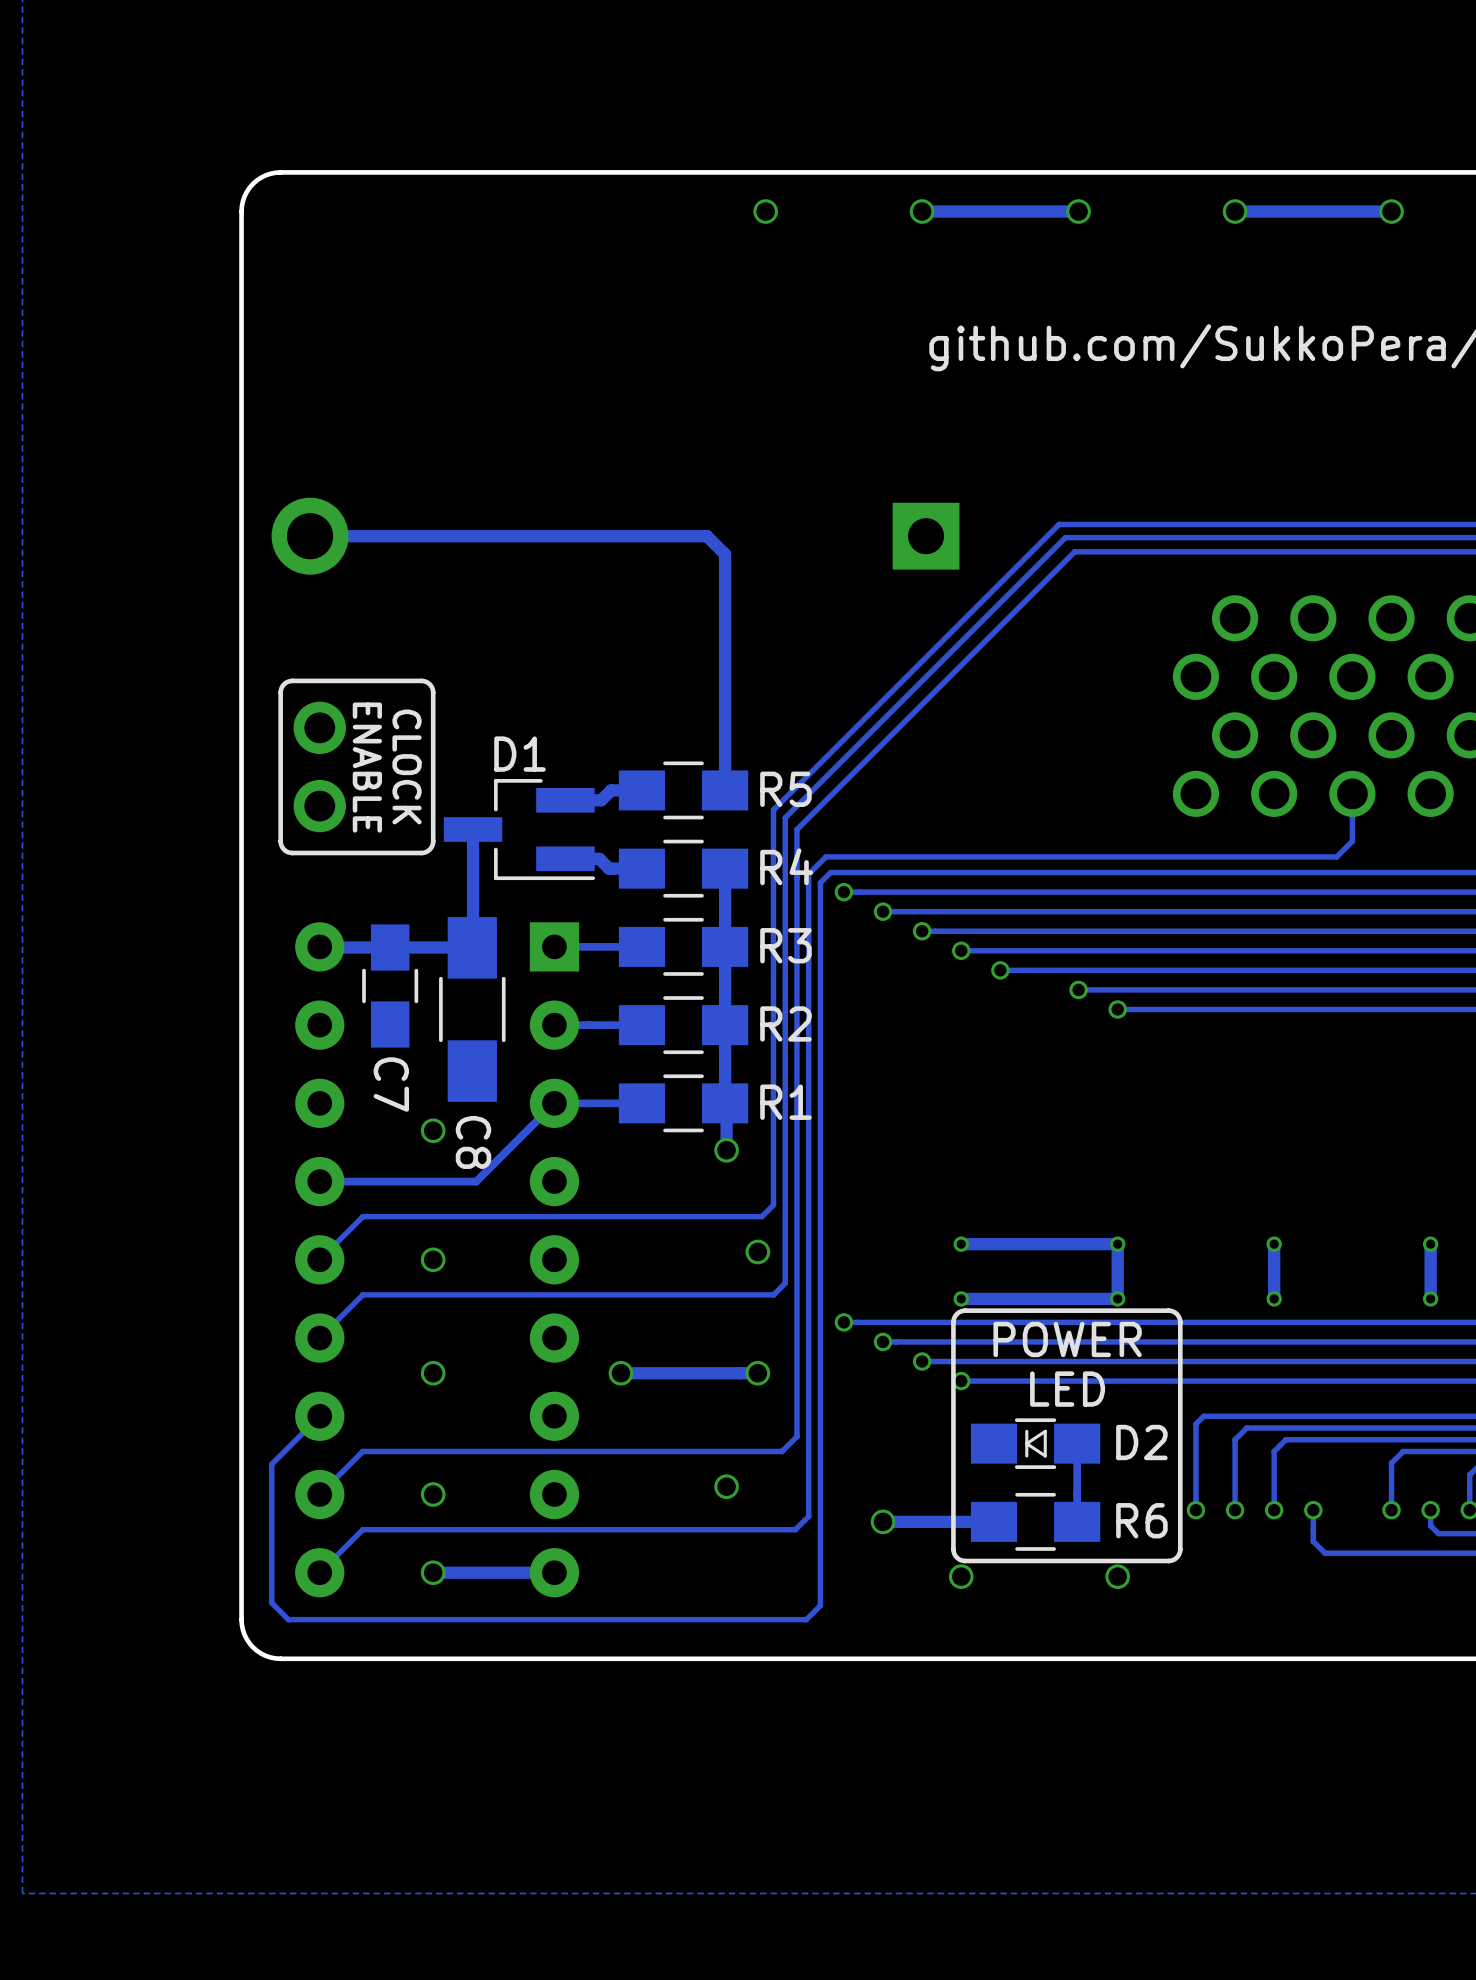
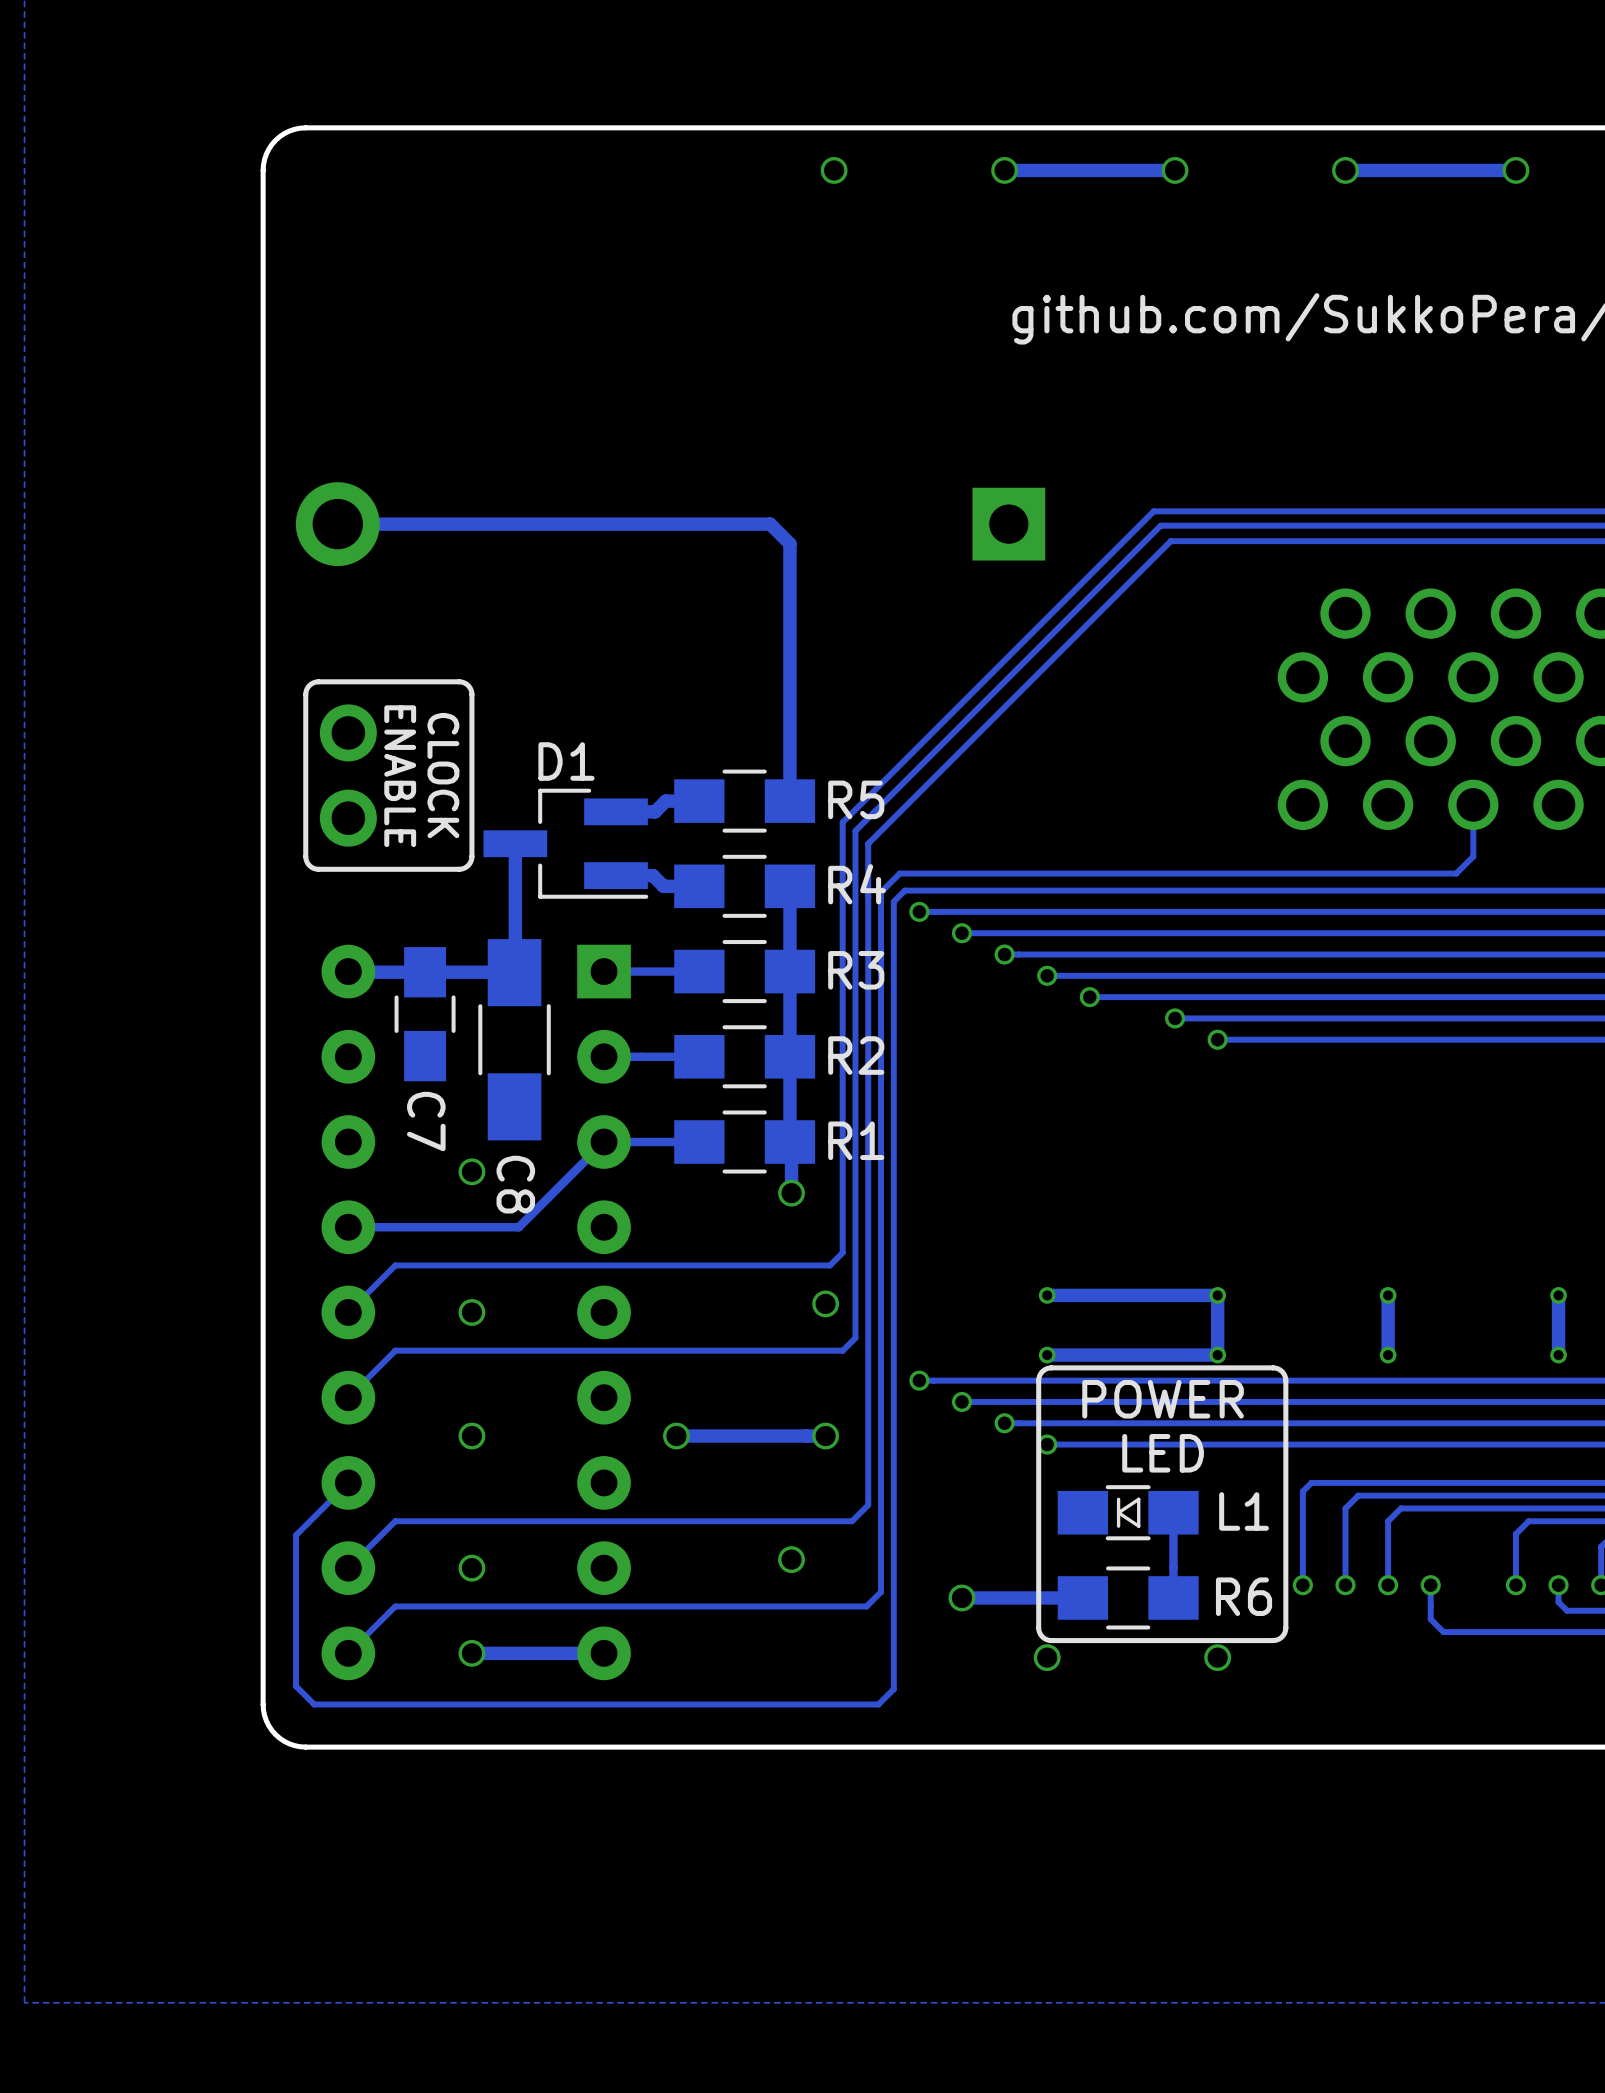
D2 name: D2 (1141, 1442) -> L1 (1244, 1511)

